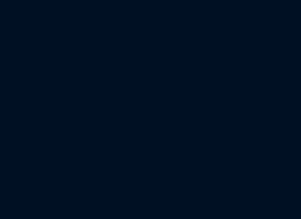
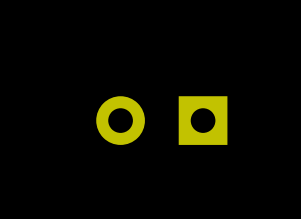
part: none -> (161, 120)

